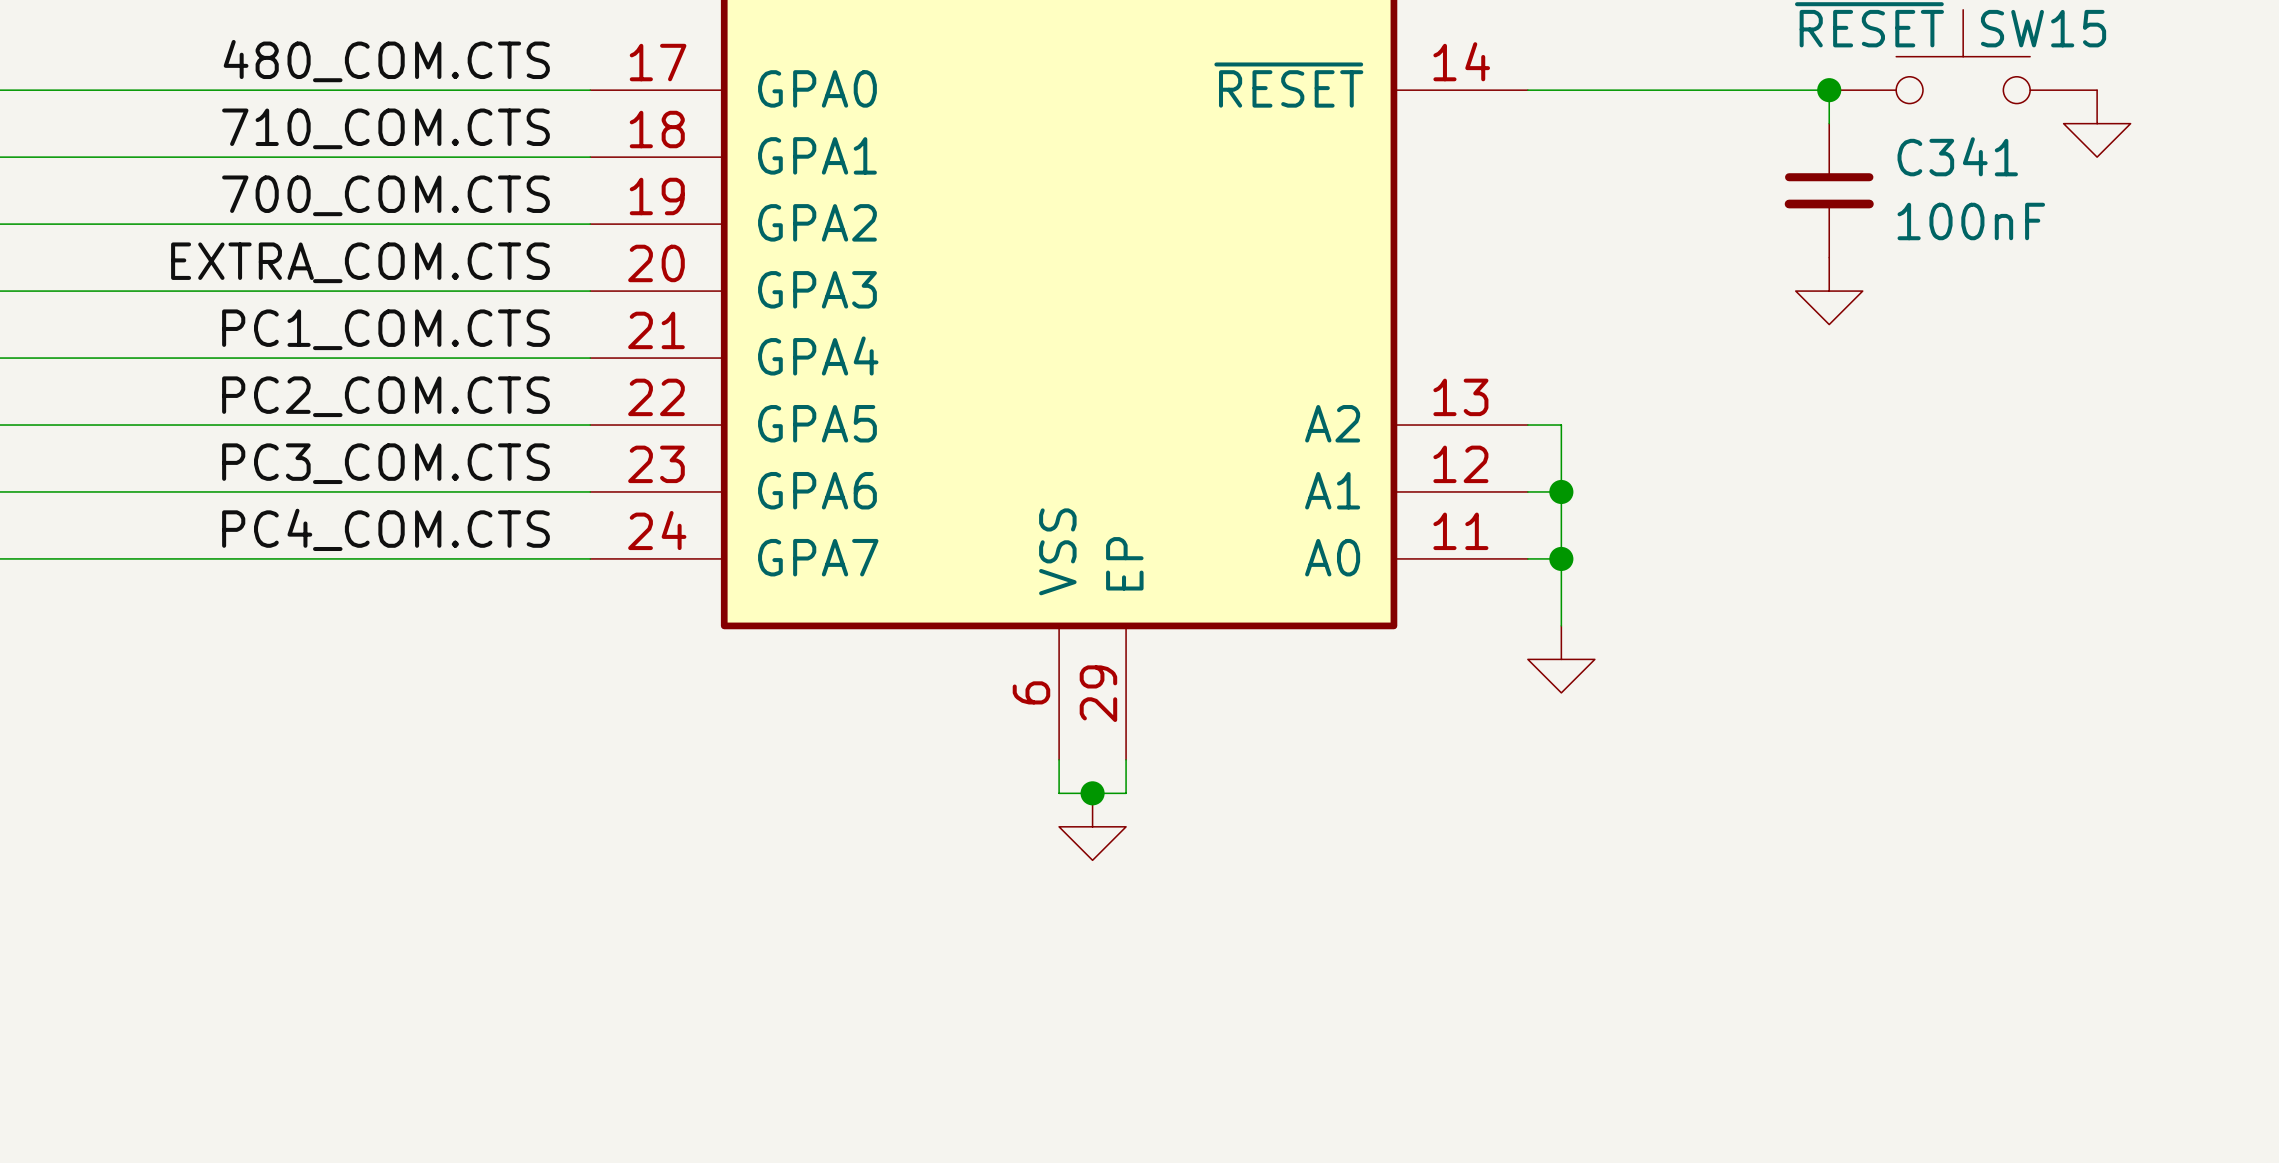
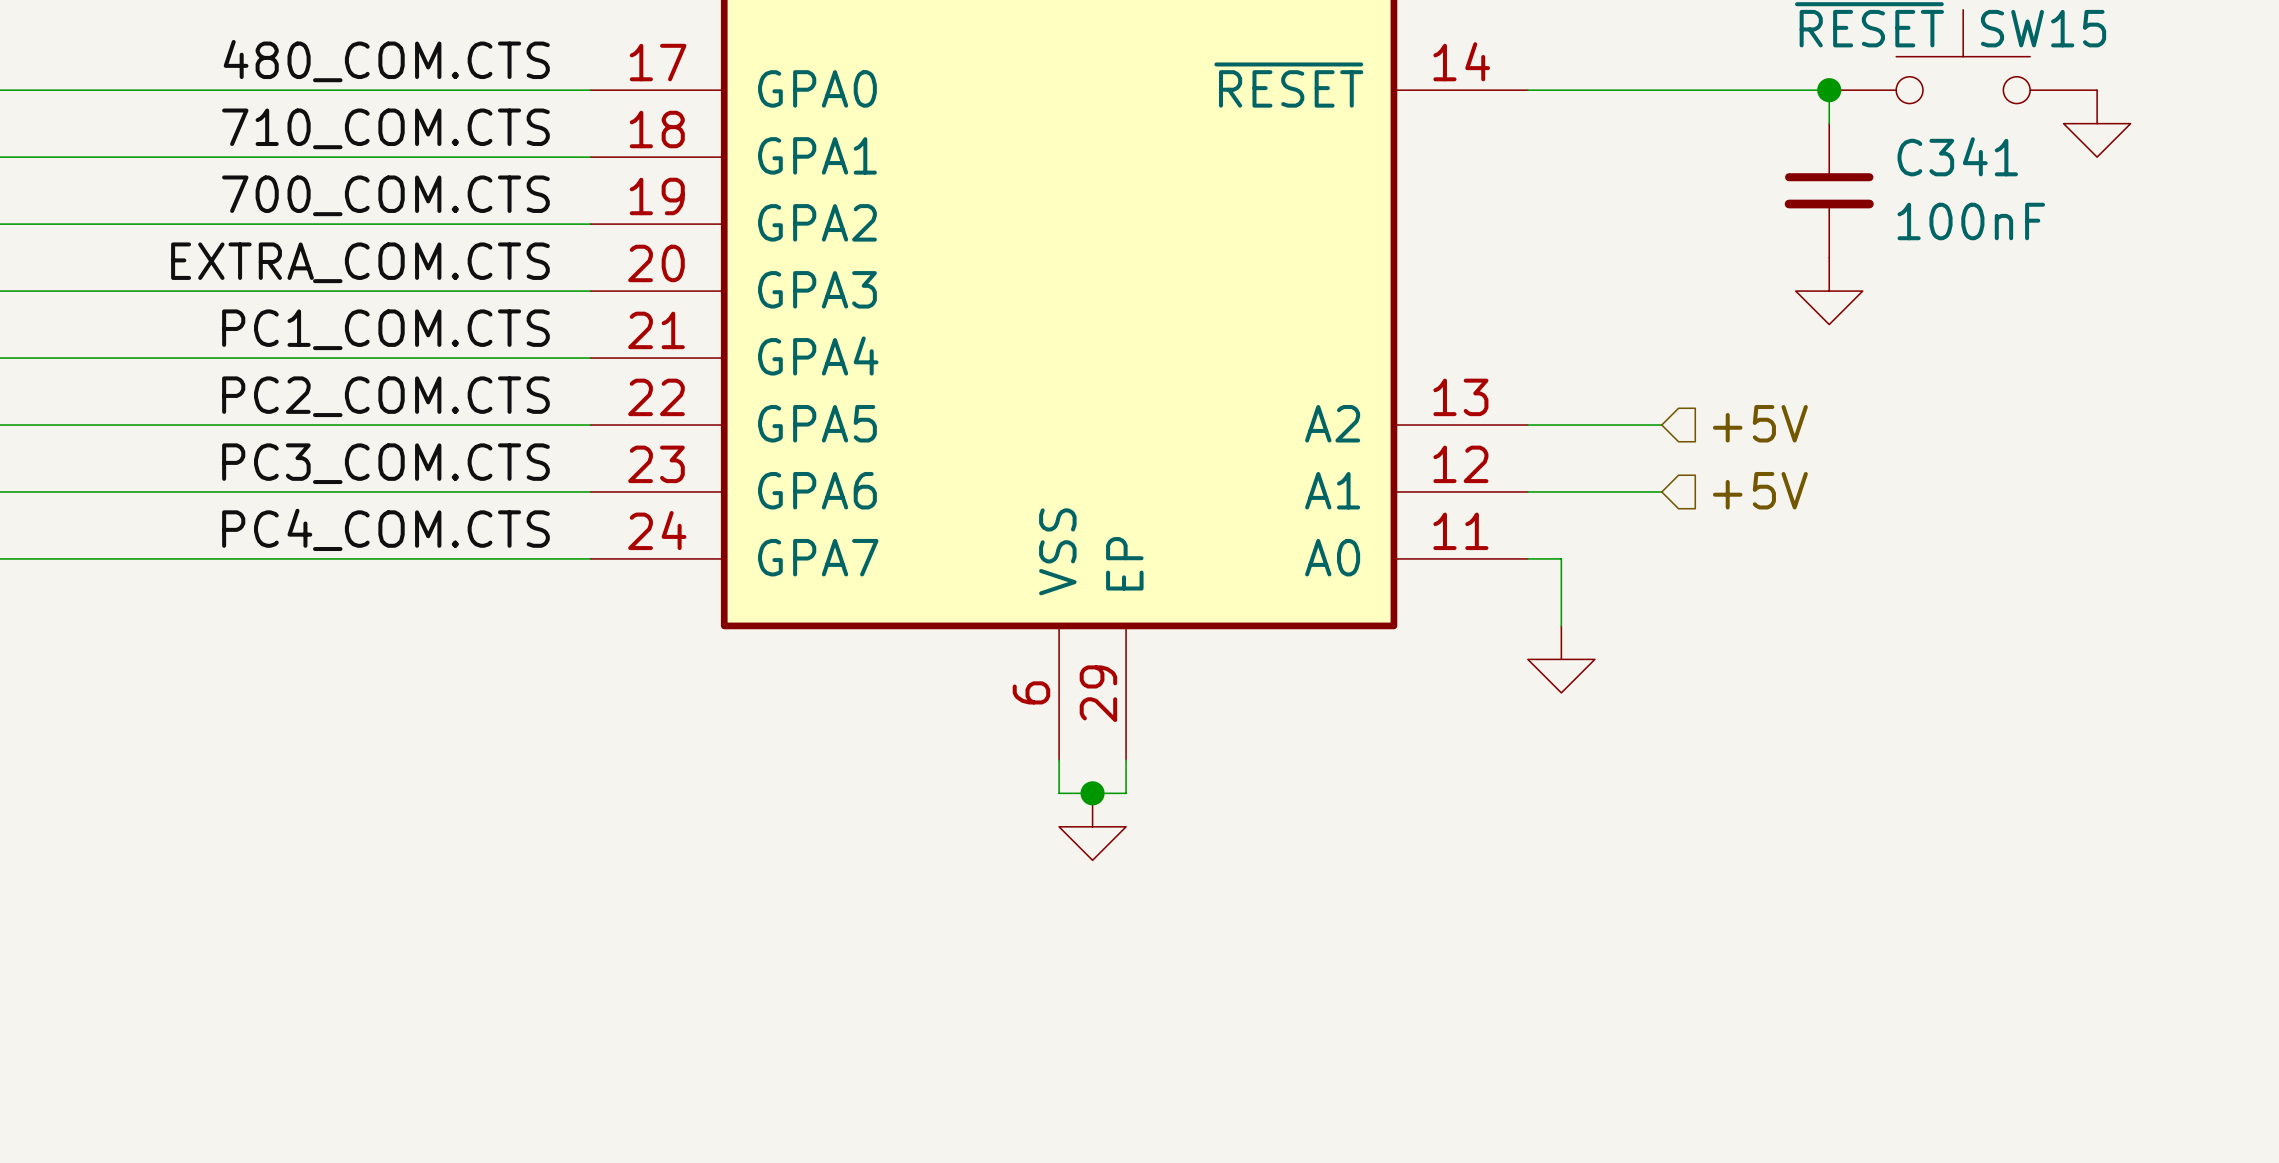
hierarchical label: none -> +5V (1760, 423)
wire: (1561, 425) (1561, 558) -> (1561, 425) (1661, 425)
hierarchical label: none -> +5V (1760, 490)
wire: none -> (1561, 491) (1661, 491)
junction: (1561, 491) -> none
junction: (1561, 558) -> none

